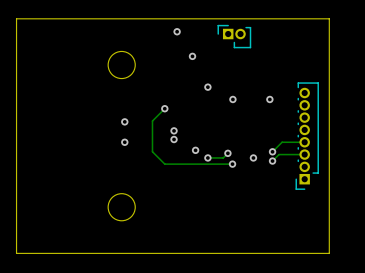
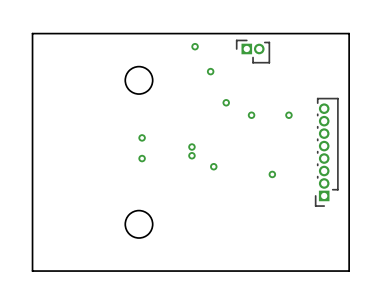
track: (164, 108) (152, 121) (152, 151) (164, 164) (232, 164) -> none
via: (164, 108) -> none
track: (304, 142) (282, 142) (272, 151) -> none
via: (272, 151) -> none
track: (227, 153) (223, 157) (207, 157) -> none
via: (227, 153) -> none
track: (304, 154) (279, 154) (272, 161) -> none
via: (207, 157) -> none
via: (272, 161) -> none
via: (232, 164) -> none

